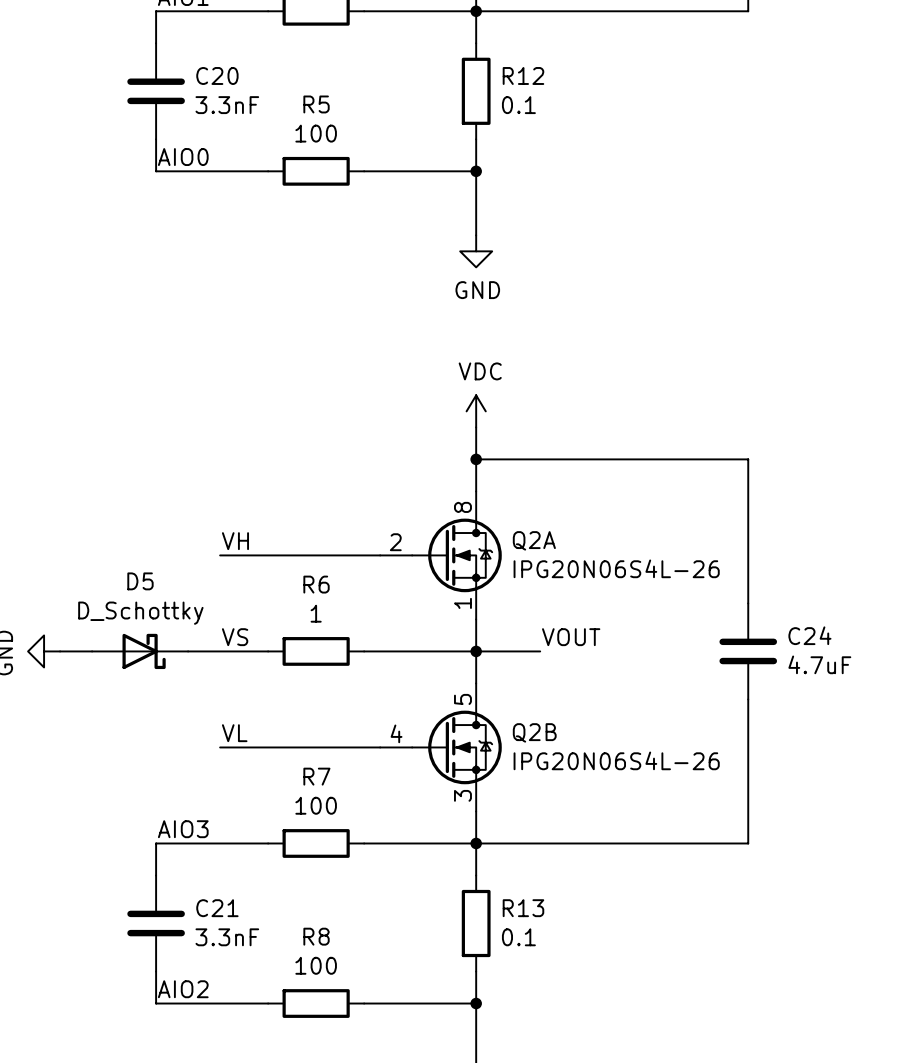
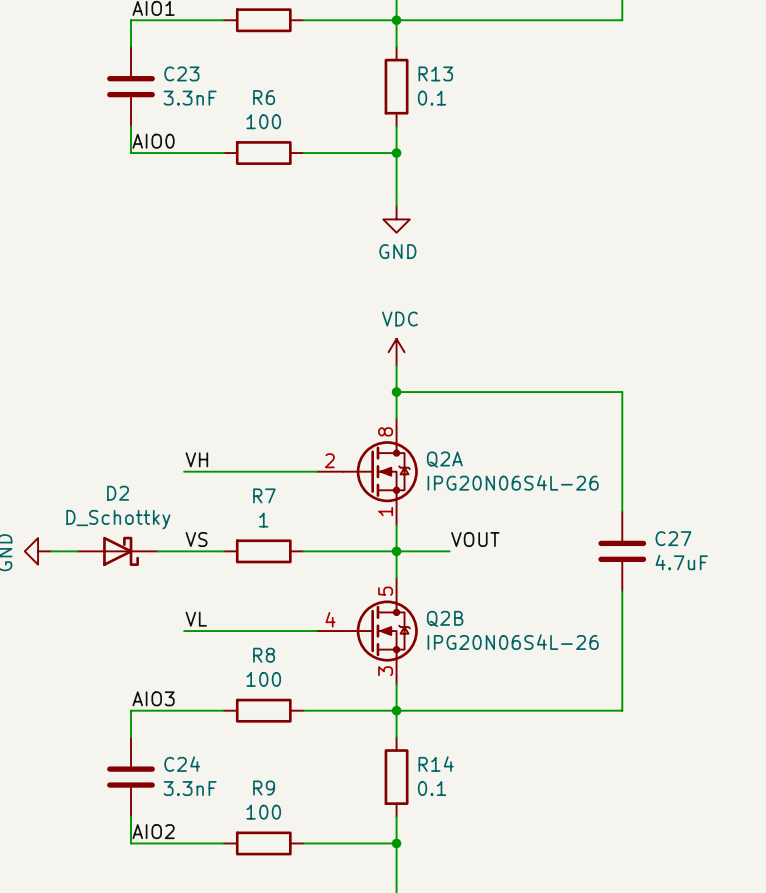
C20 name: C20 (217, 75) -> C23 (181, 73)
R12 name: R12 (523, 75) -> R13 (435, 73)
R5 name: R5 (316, 104) -> R6 (264, 97)
D5 name: D5 (140, 581) -> D2 (118, 493)
R6 name: R6 (316, 584) -> R7 (264, 495)
C24 name: C24 (809, 635) -> C27 (673, 538)
R7 name: R7 (316, 776) -> R8 (264, 655)
C21 name: C21 (217, 908) -> C24 (182, 764)
R13 name: R13 (523, 908) -> R14 (436, 764)
R8 name: R8 (316, 936) -> R9 (264, 788)

